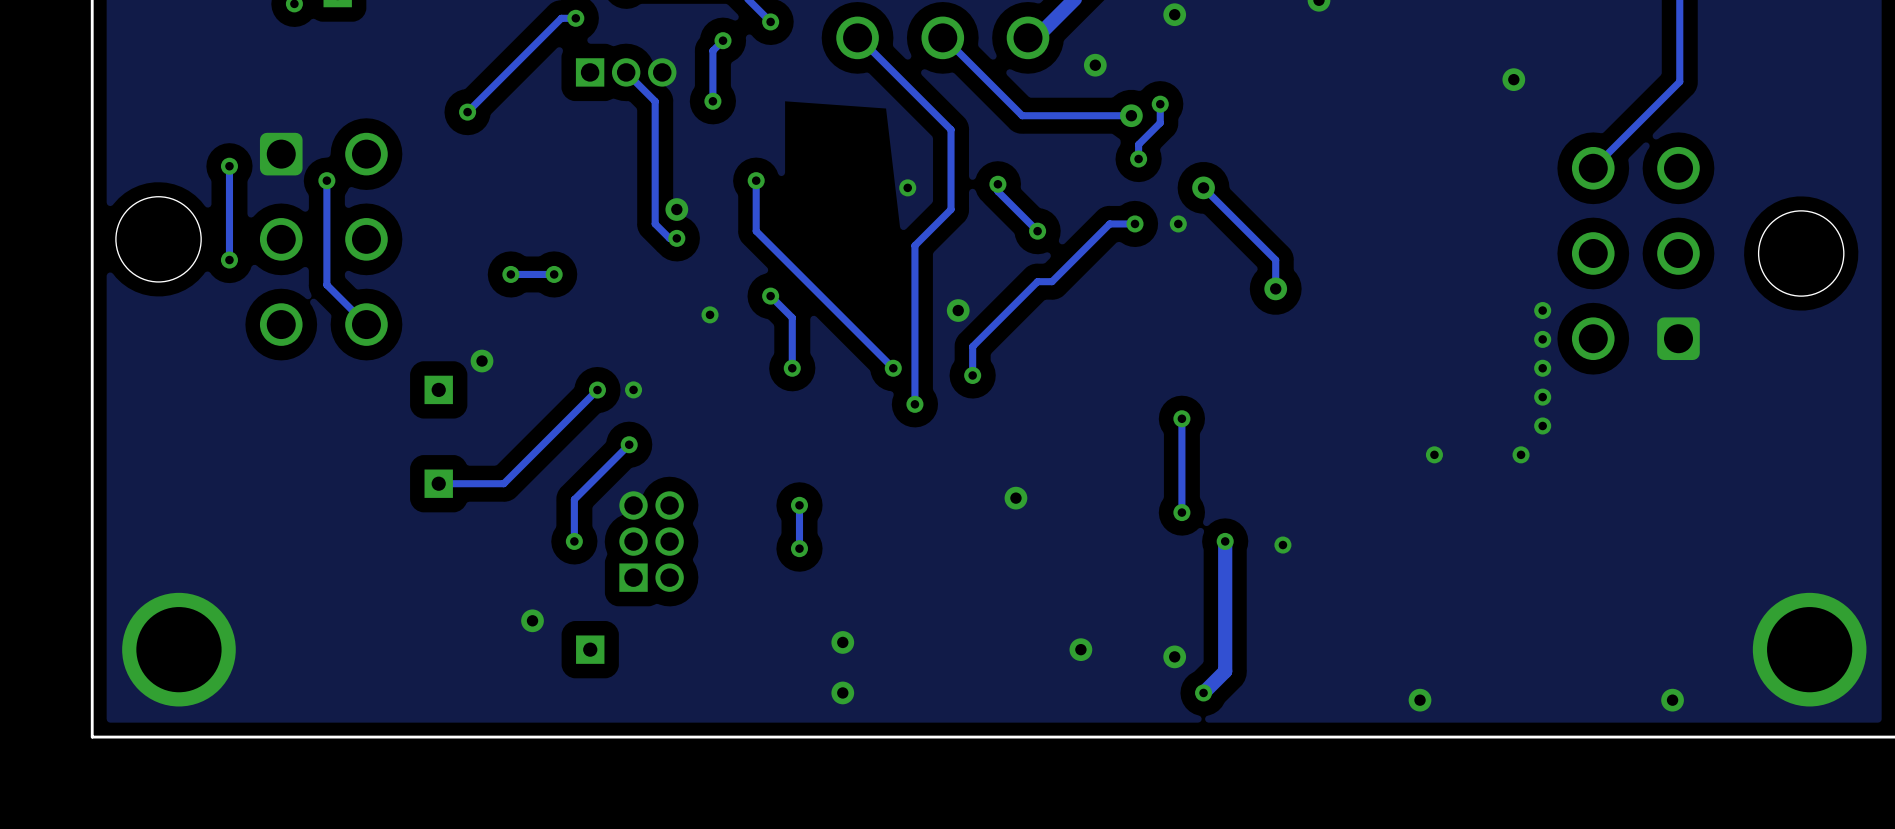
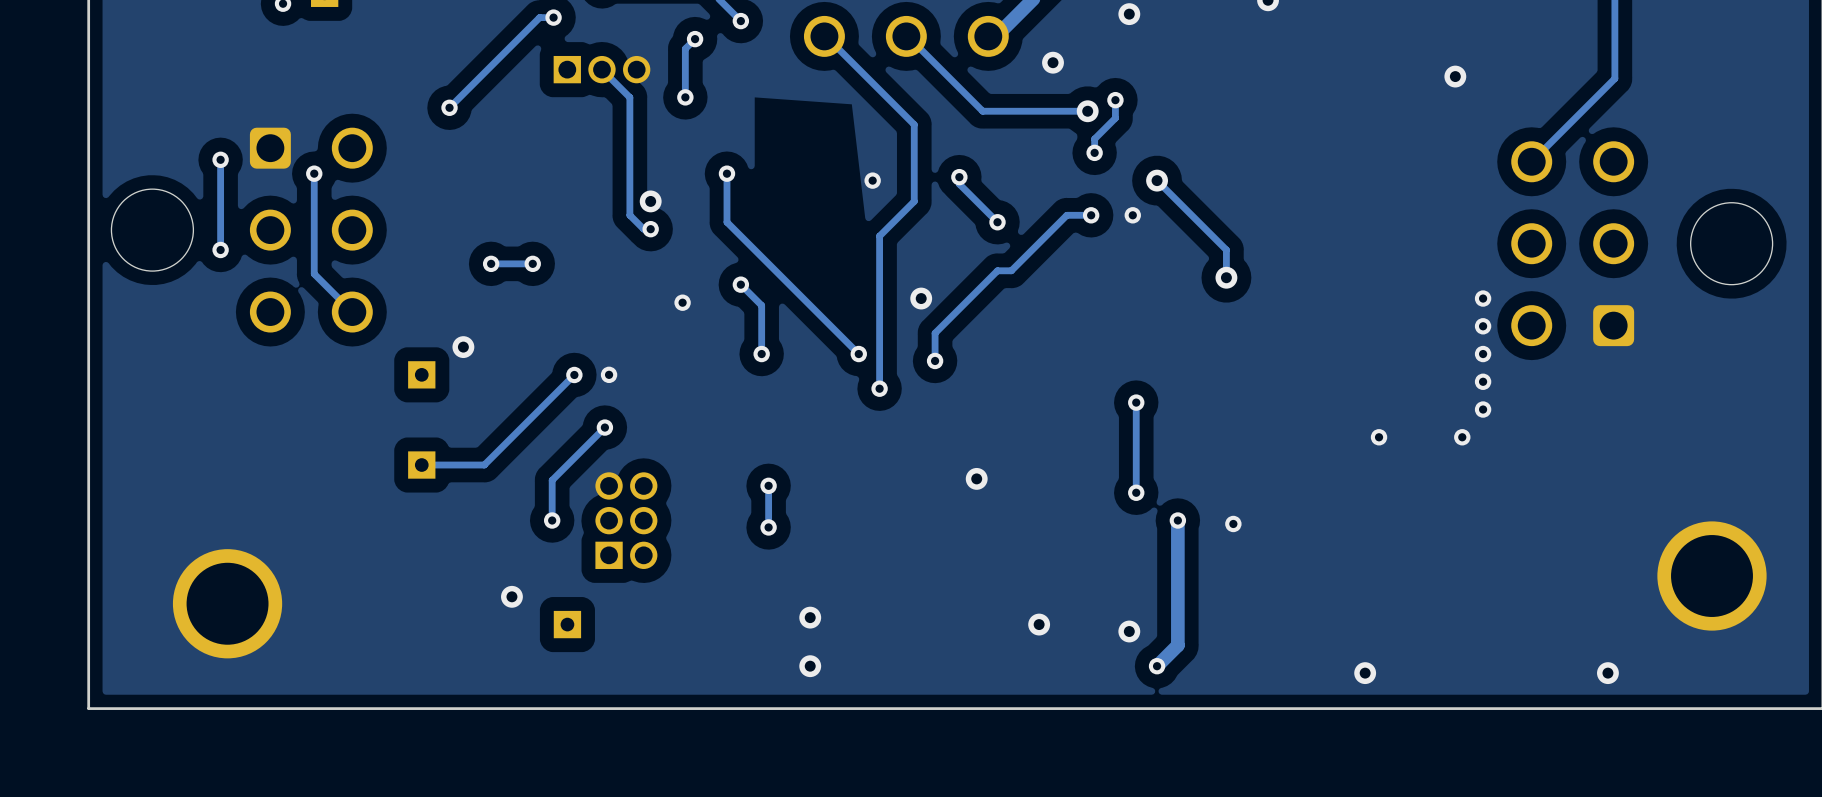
part position: (178, 649) -> (227, 603)
part position: (1809, 649) -> (1711, 576)

